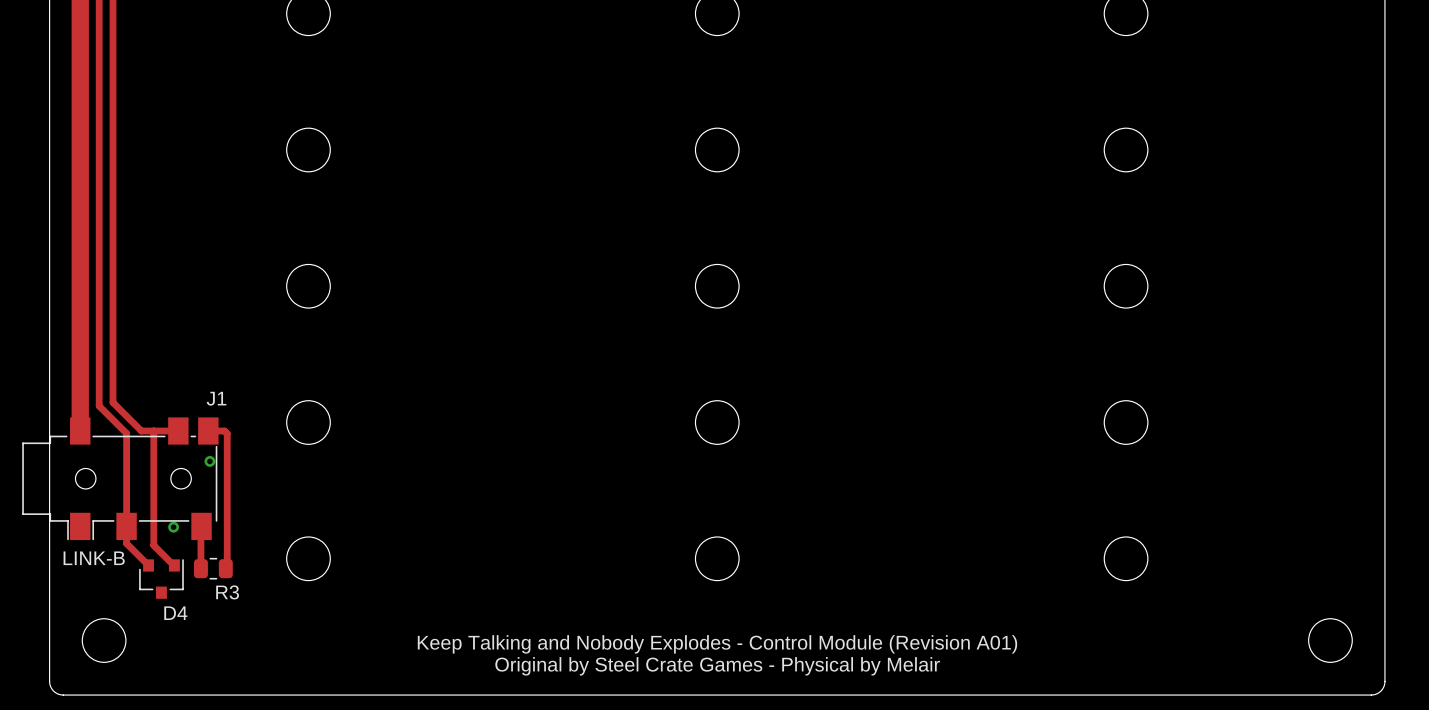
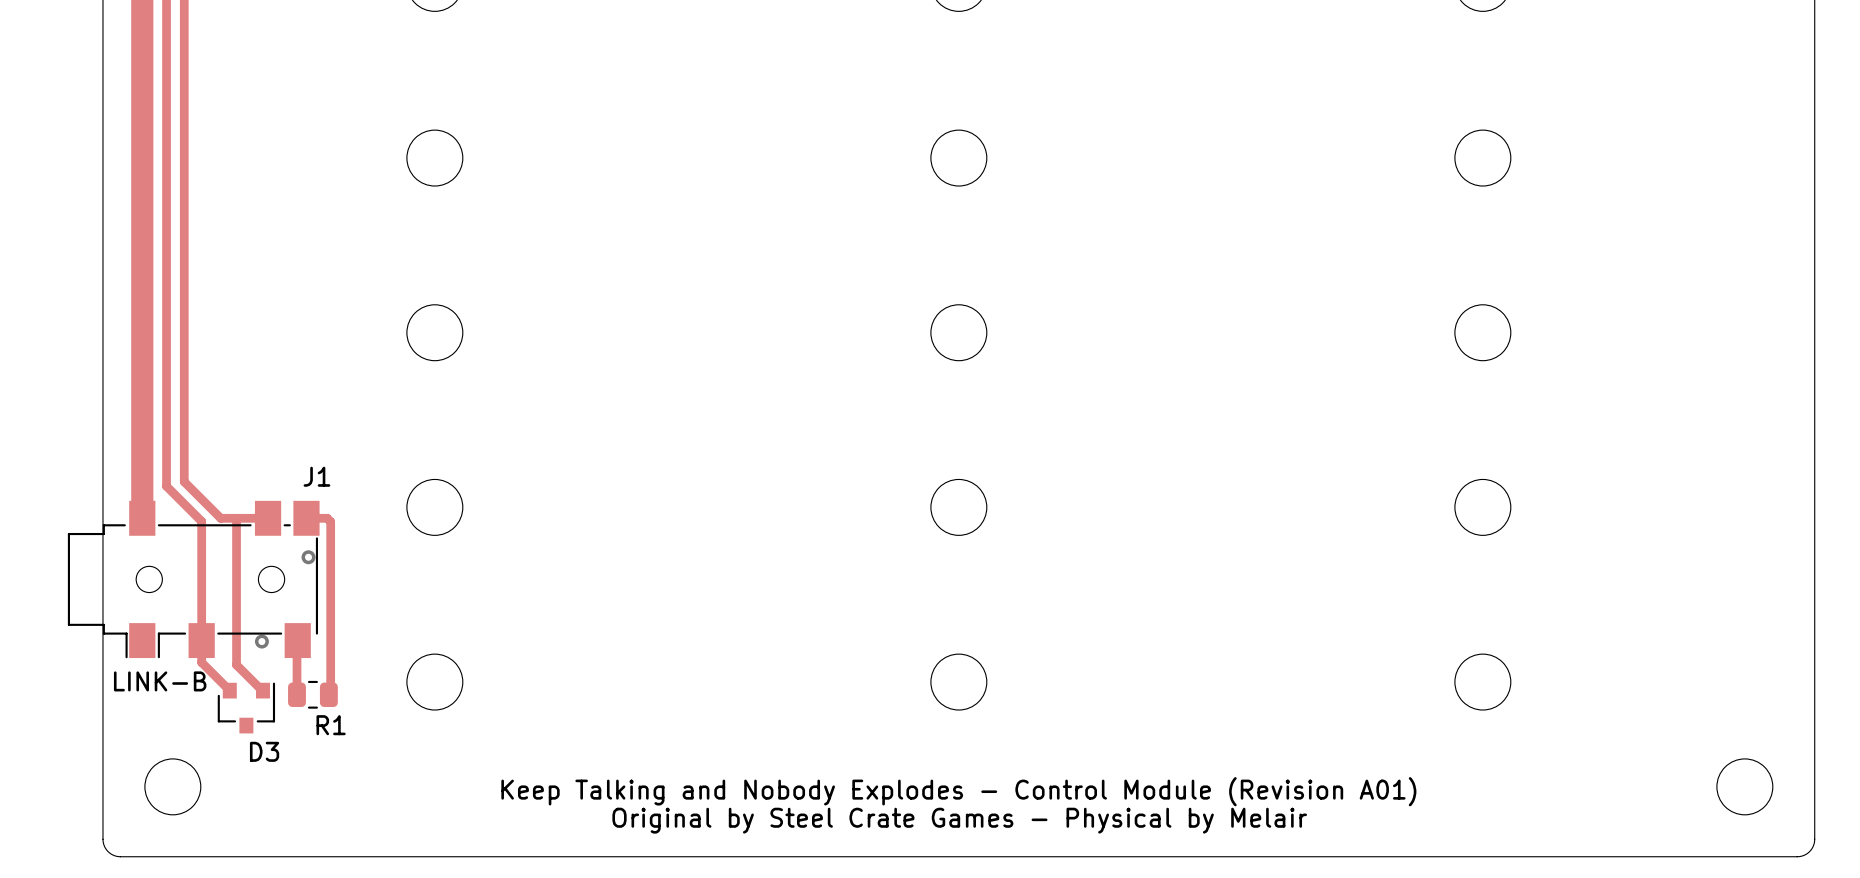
R3 name: R3 (227, 592) -> R1 (331, 725)
D4 name: D4 (175, 613) -> D3 (264, 751)

